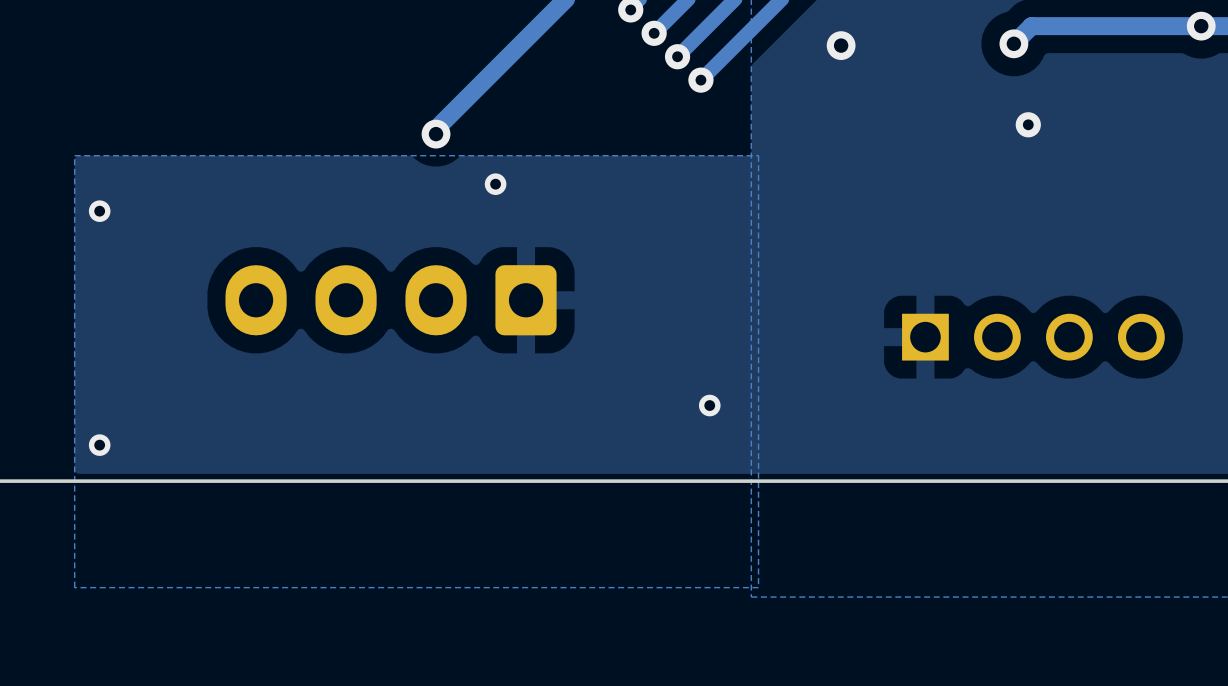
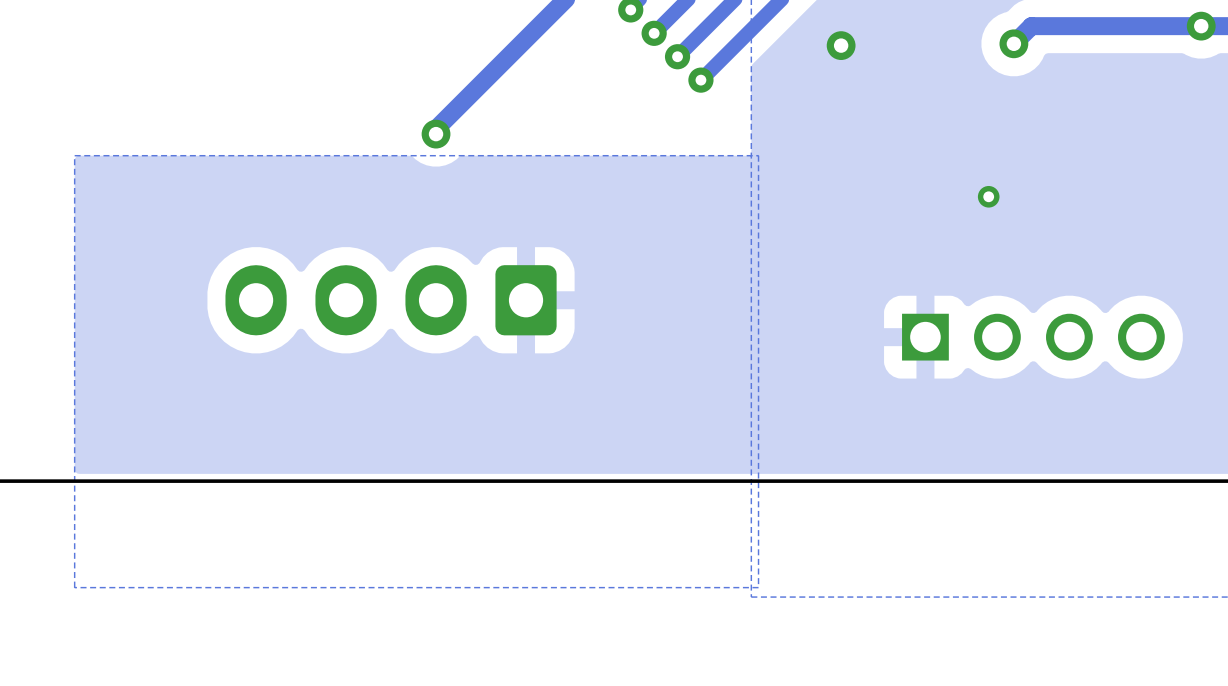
via: (1028, 124) -> none
via: (495, 184) -> none
via: none -> (988, 196)
via: (99, 211) -> none
via: (709, 405) -> none
via: (99, 445) -> none

